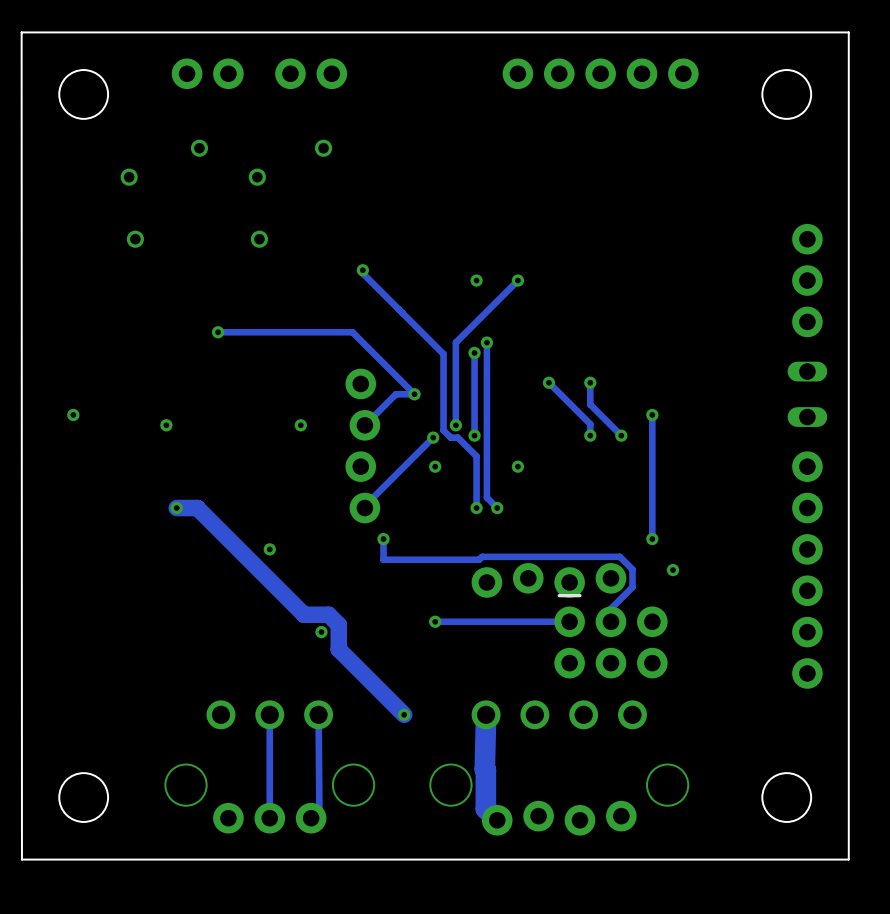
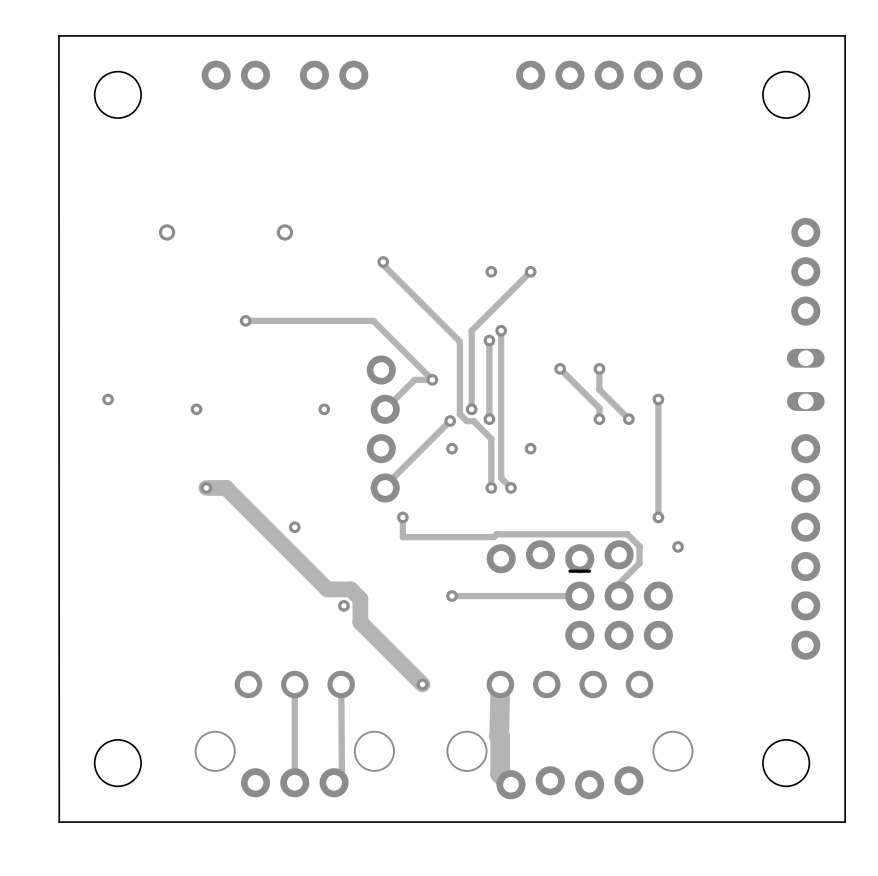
via: (199, 148) -> none
via: (323, 148) -> none
via: (129, 177) -> none
via: (257, 177) -> none

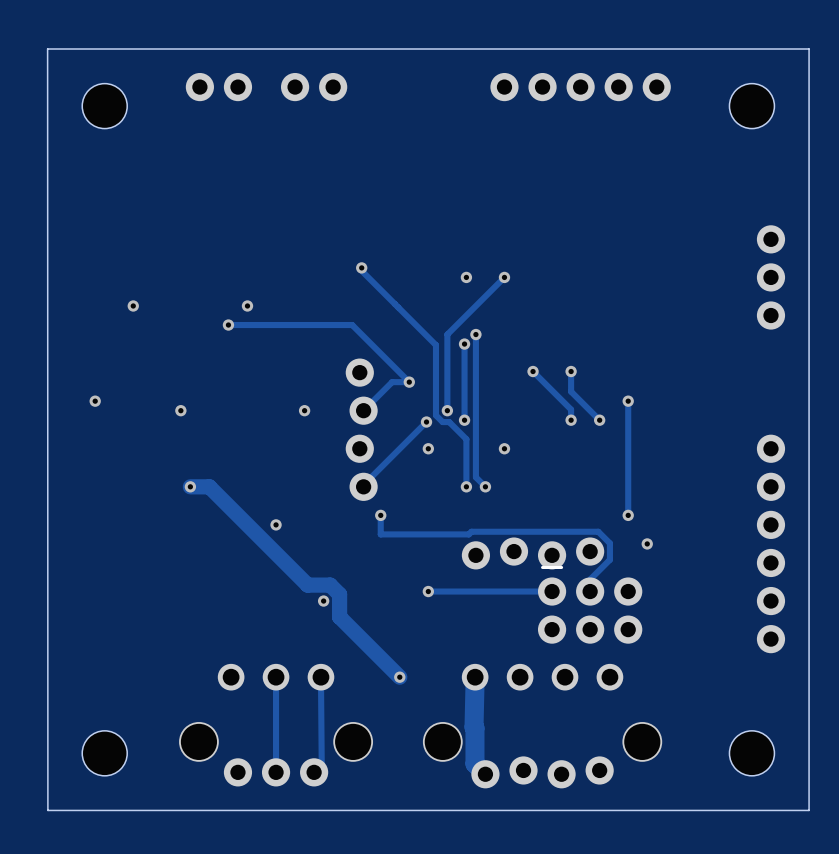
via: (167, 232) -> none
via: (284, 232) -> none
via: none -> (133, 305)
via: none -> (247, 305)
part: (805, 379) -> none

